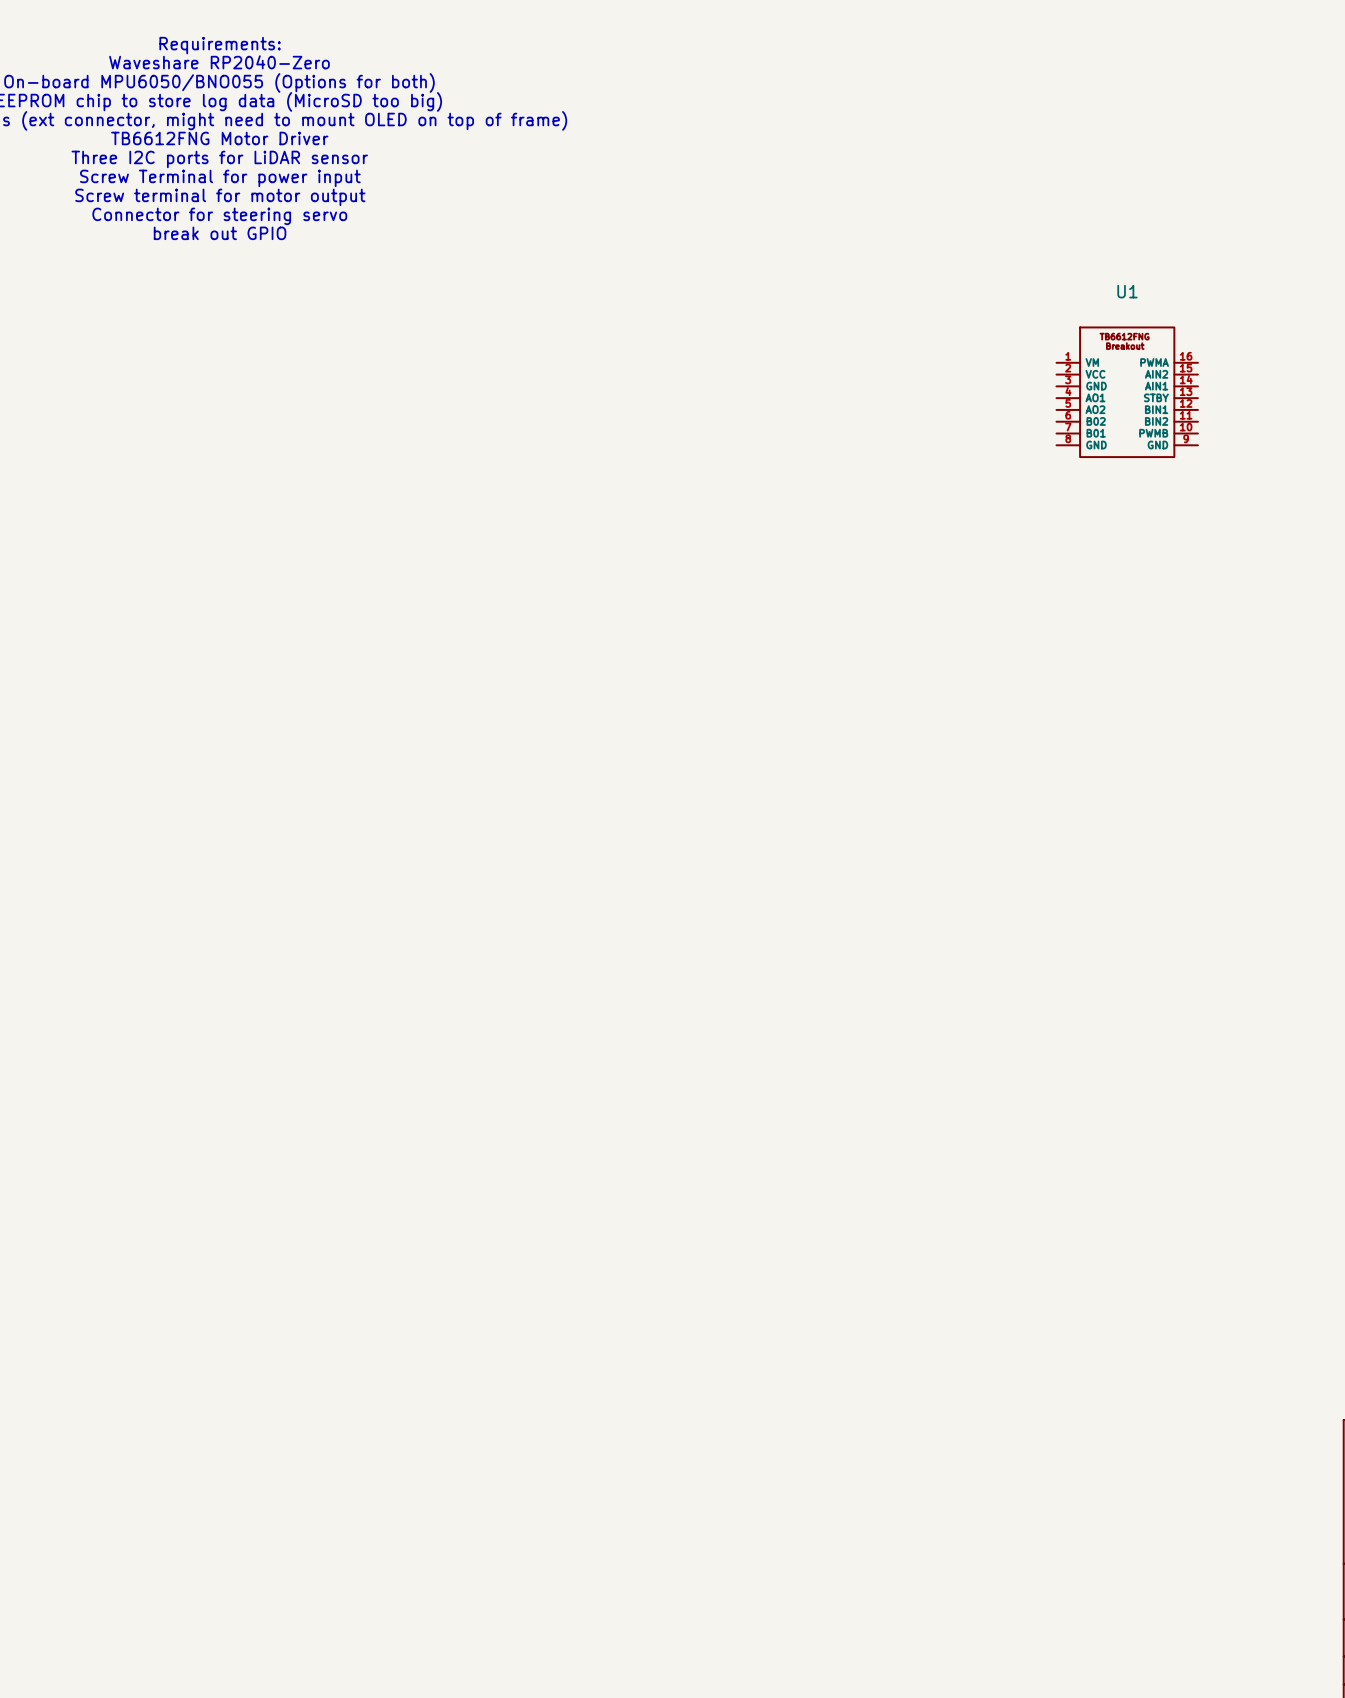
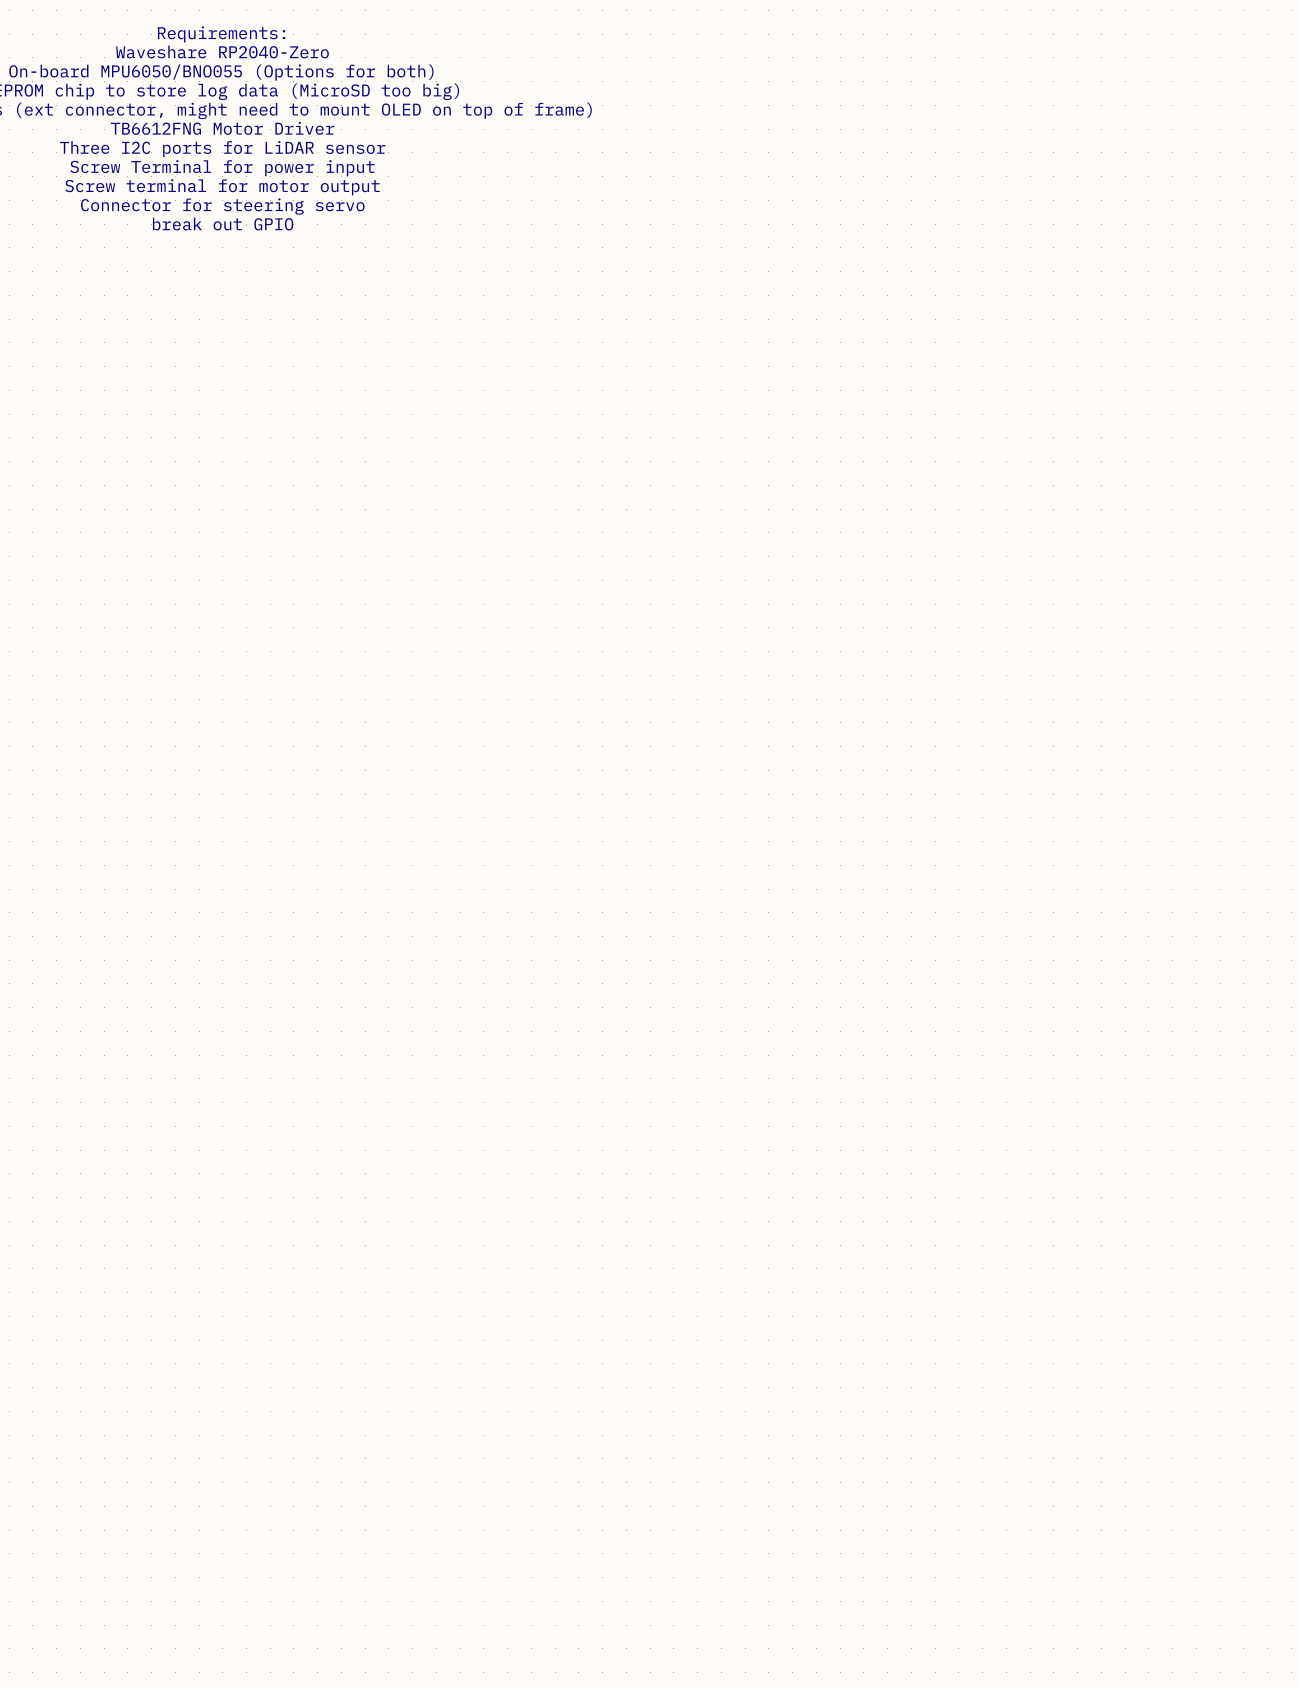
U1: (1127, 392) -> none

